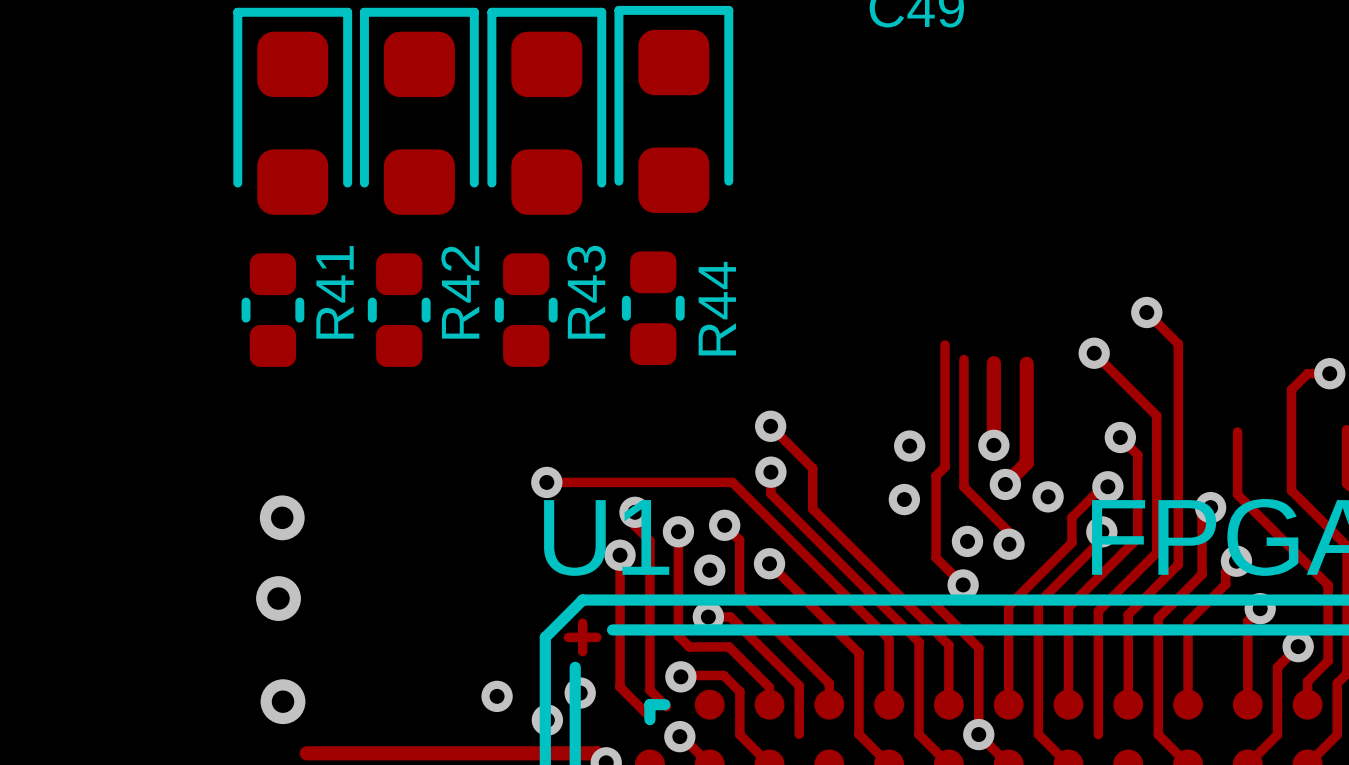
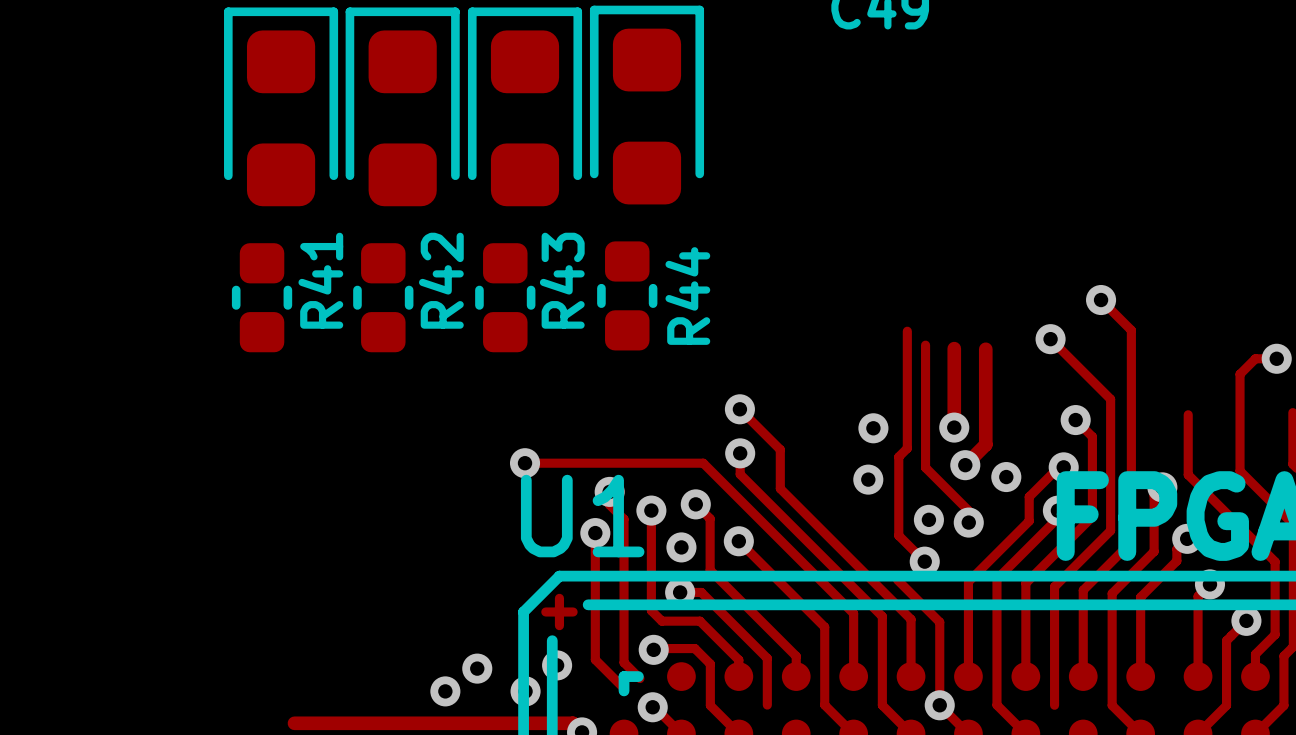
via: (282, 517) -> none
via: (278, 598) -> none
via: (283, 701) -> none
via: none -> (445, 691)

